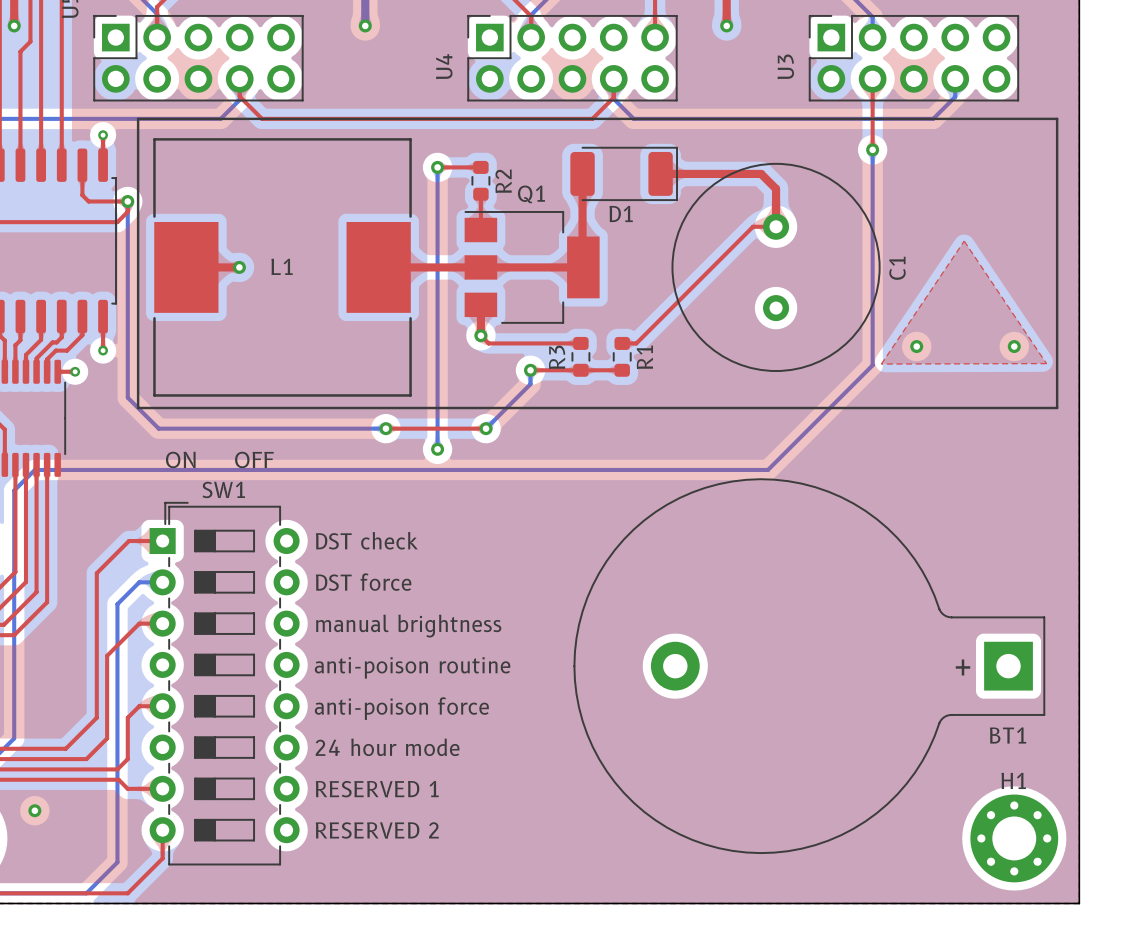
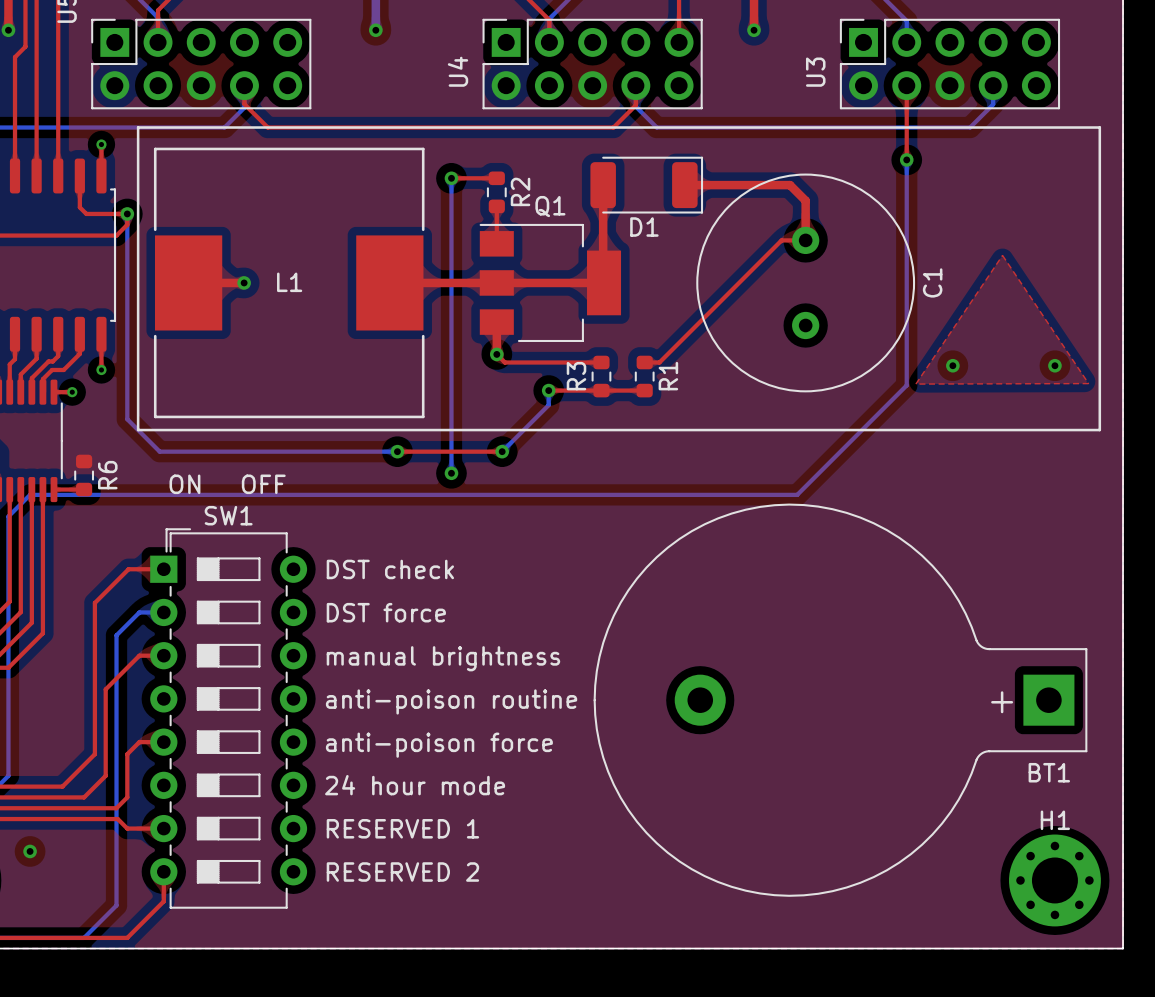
R6: none -> (84, 475)
top track: none -> (53, 489) (84, 489)

